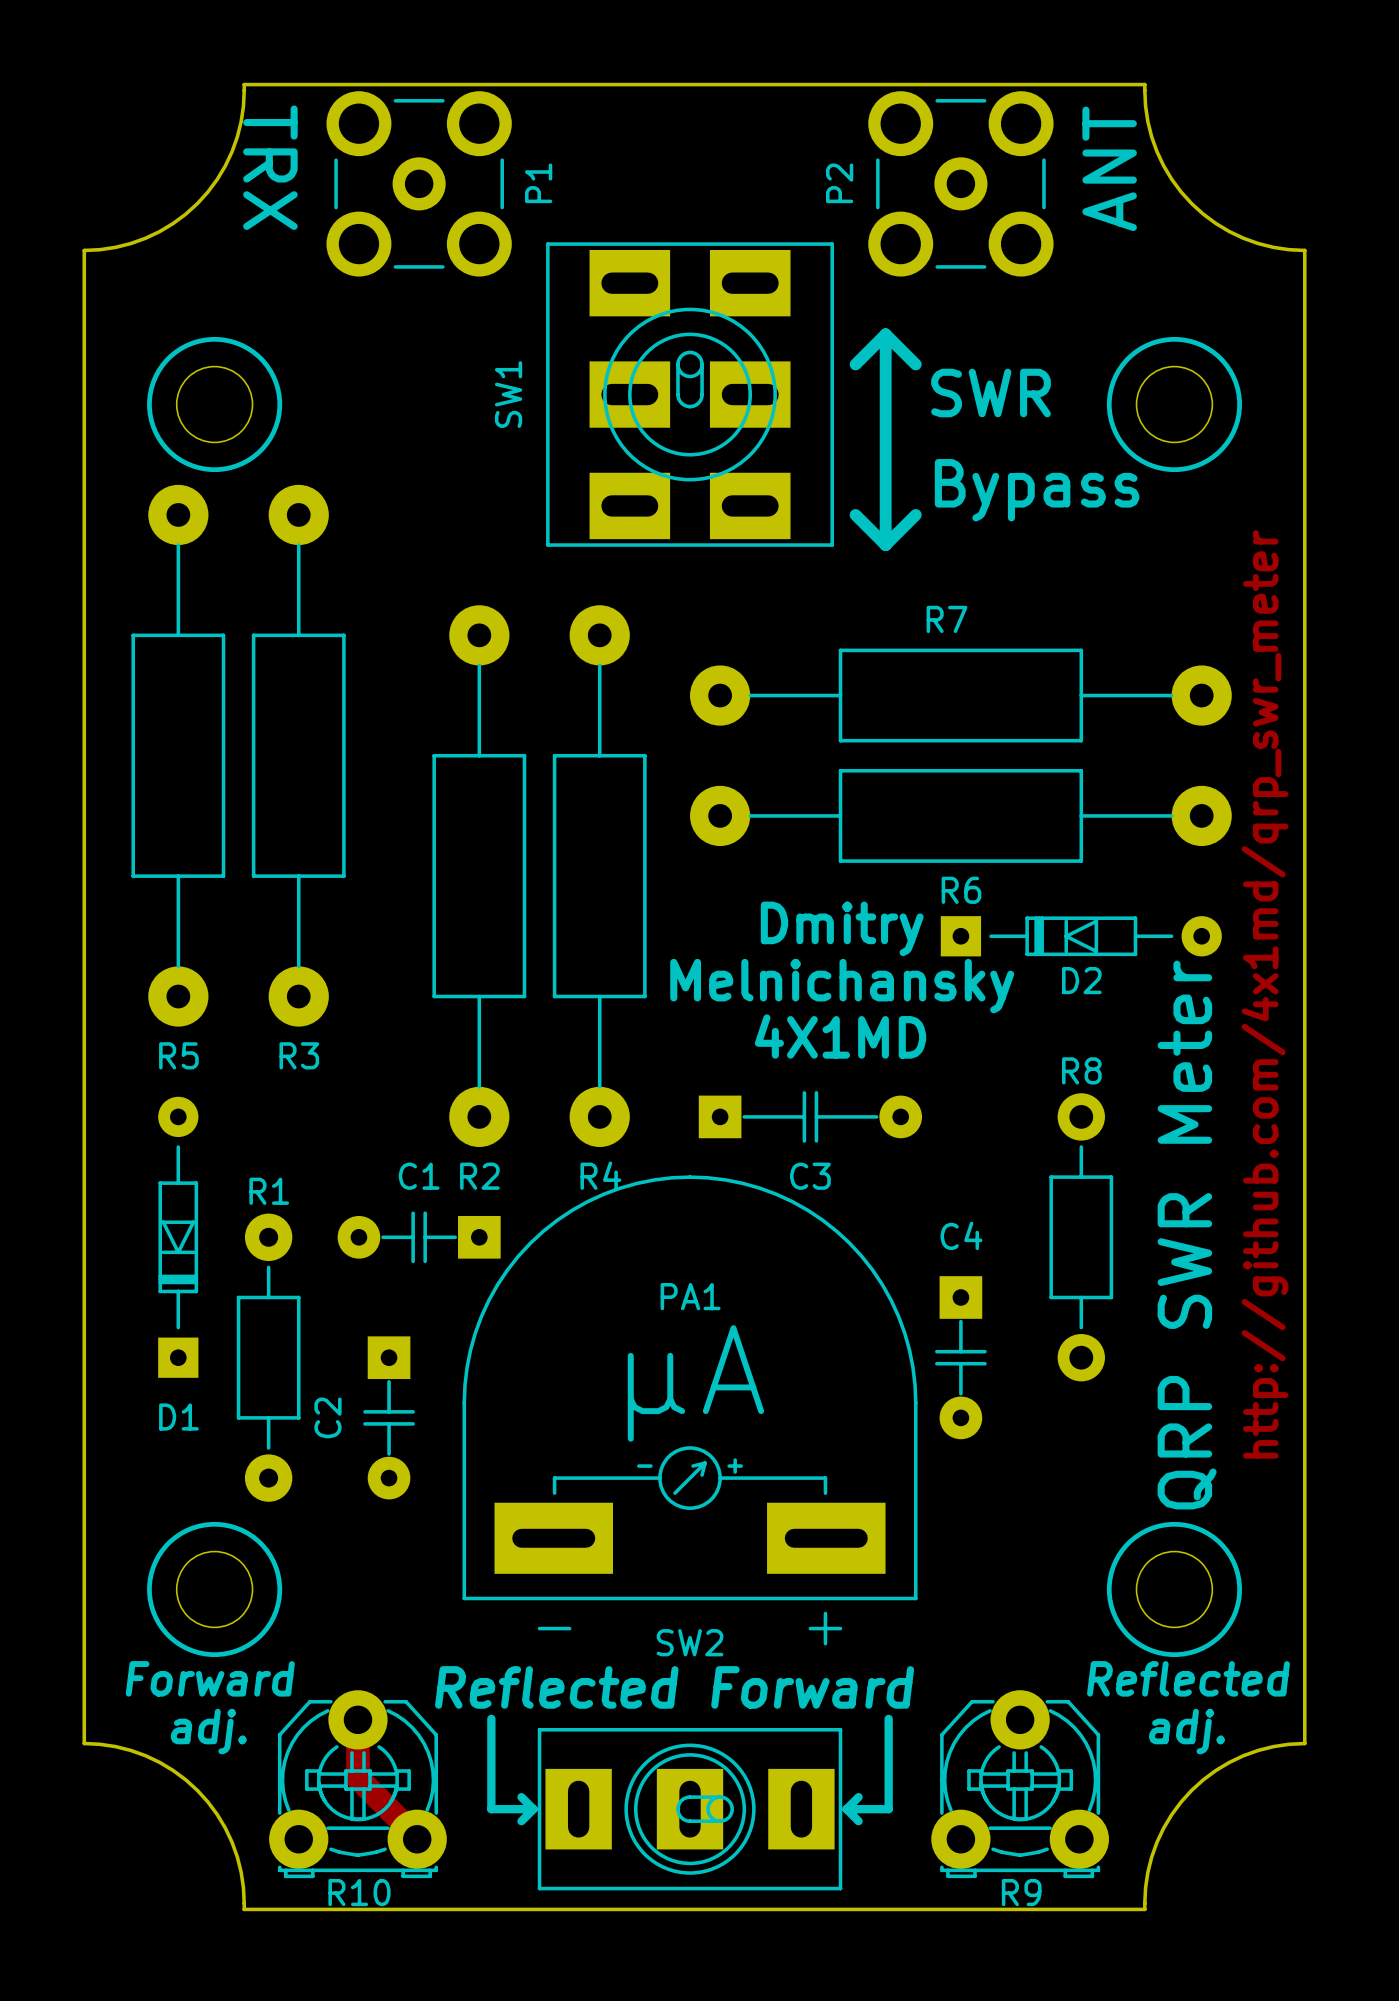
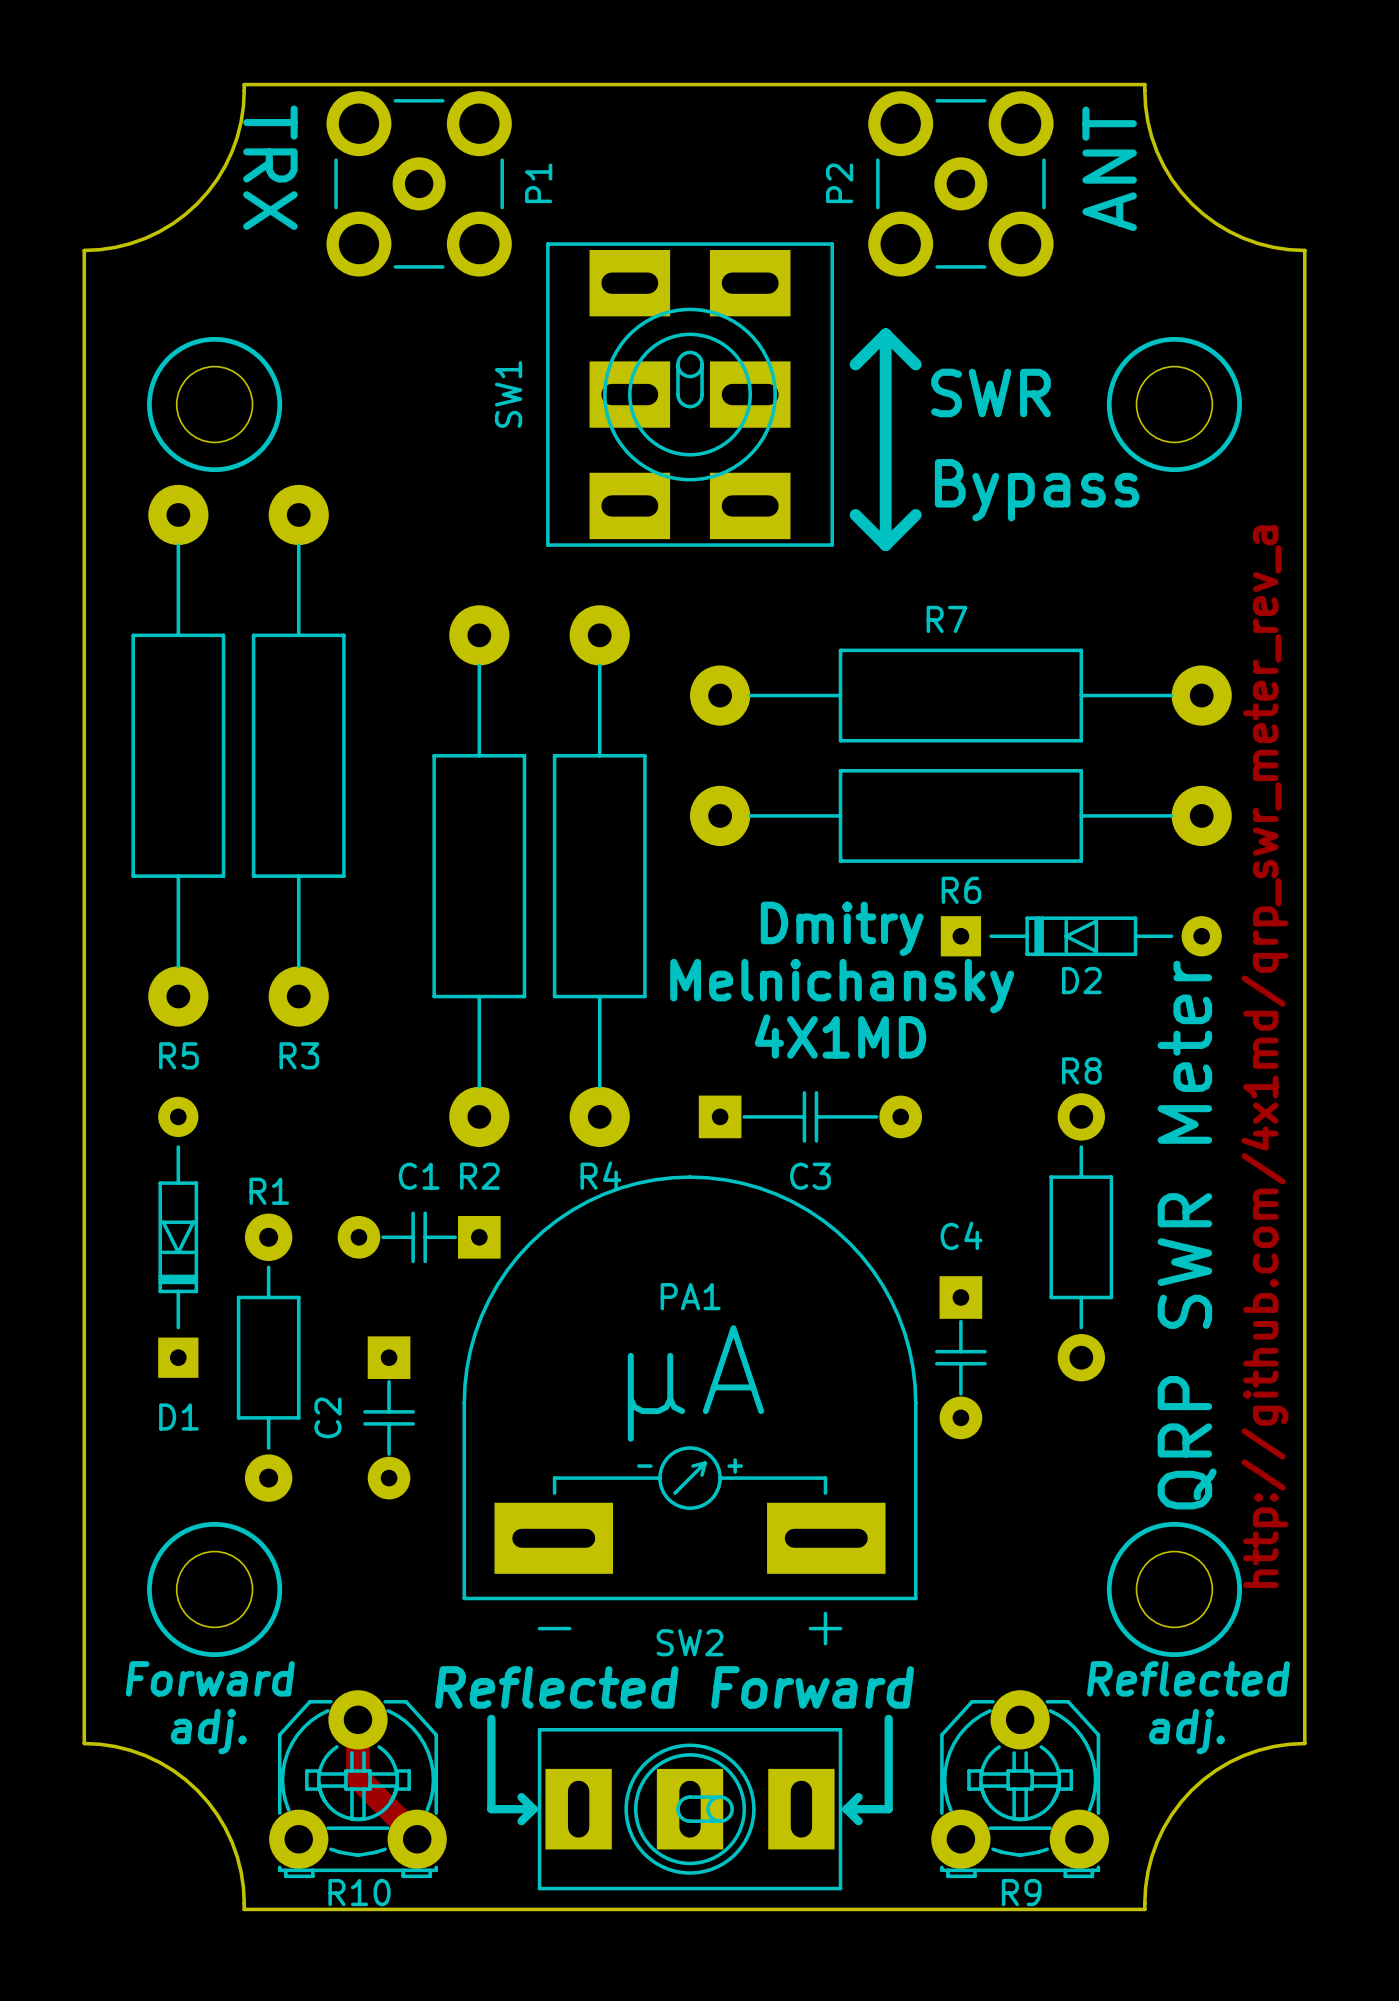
text: http://github.com/4x1md/qrp_swr_meter (1265, 994) -> http://github.com/4x1md/qrp_swr_meter_rev_a (1265, 1056)

